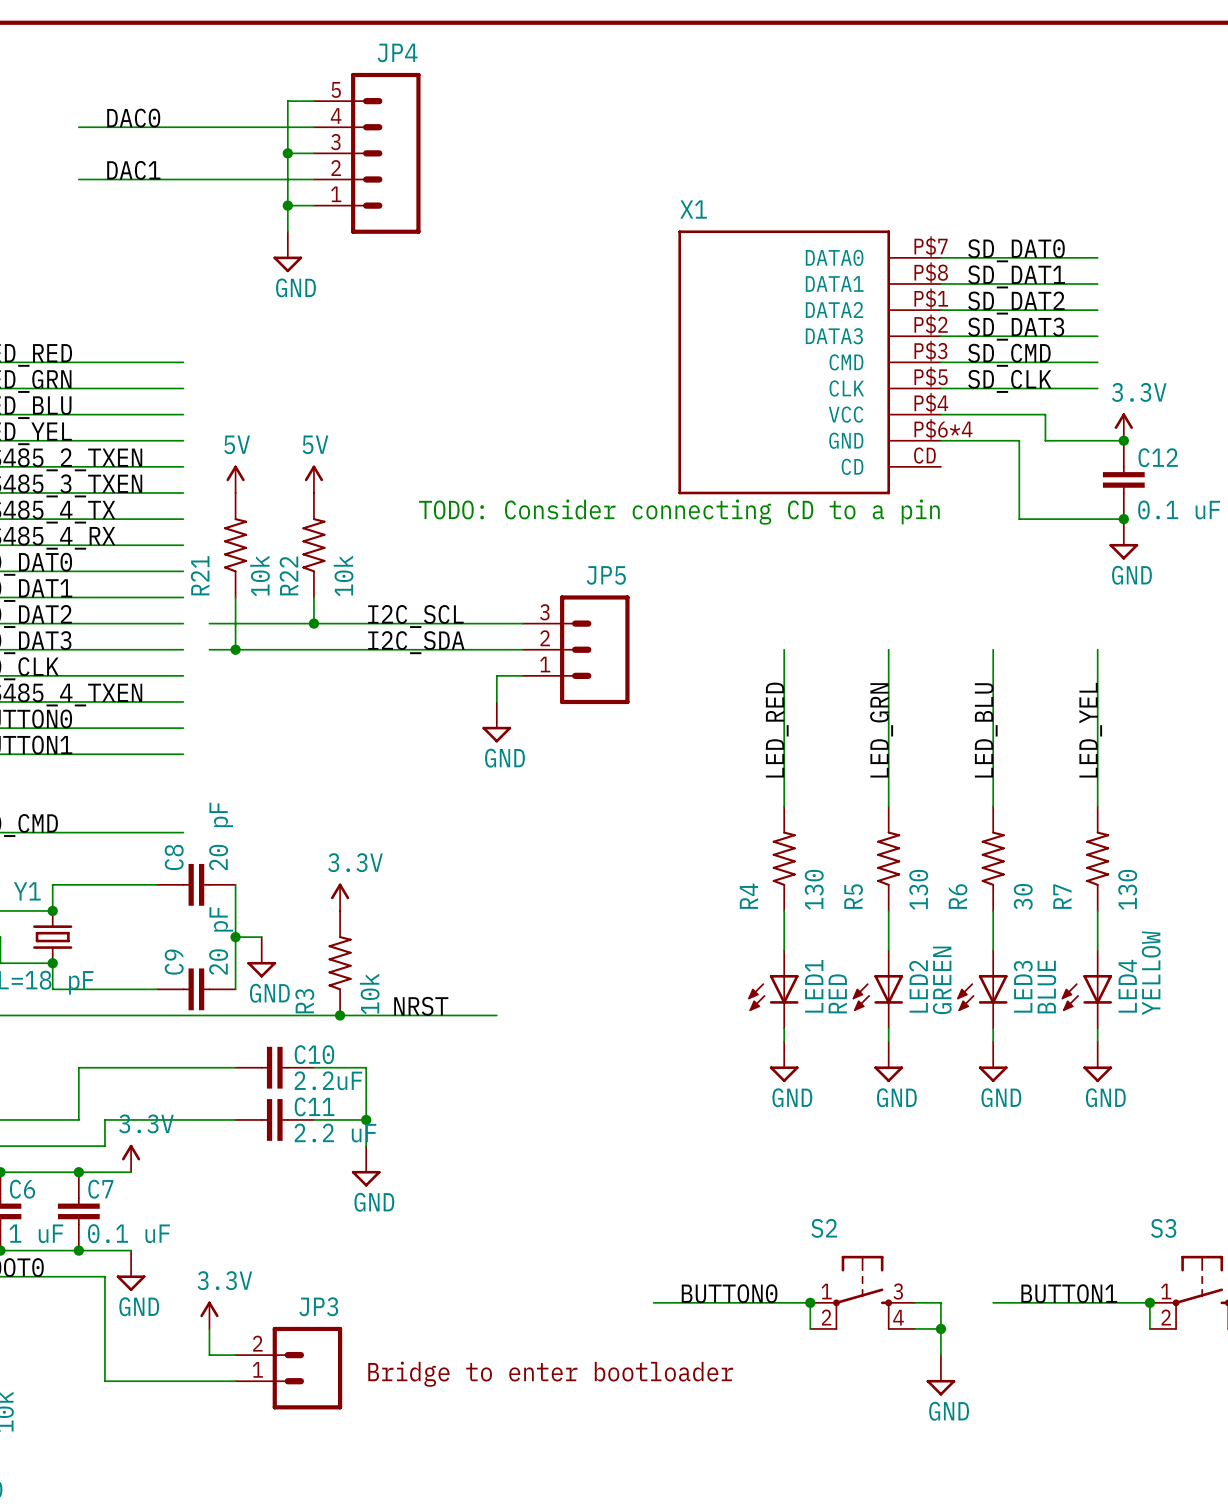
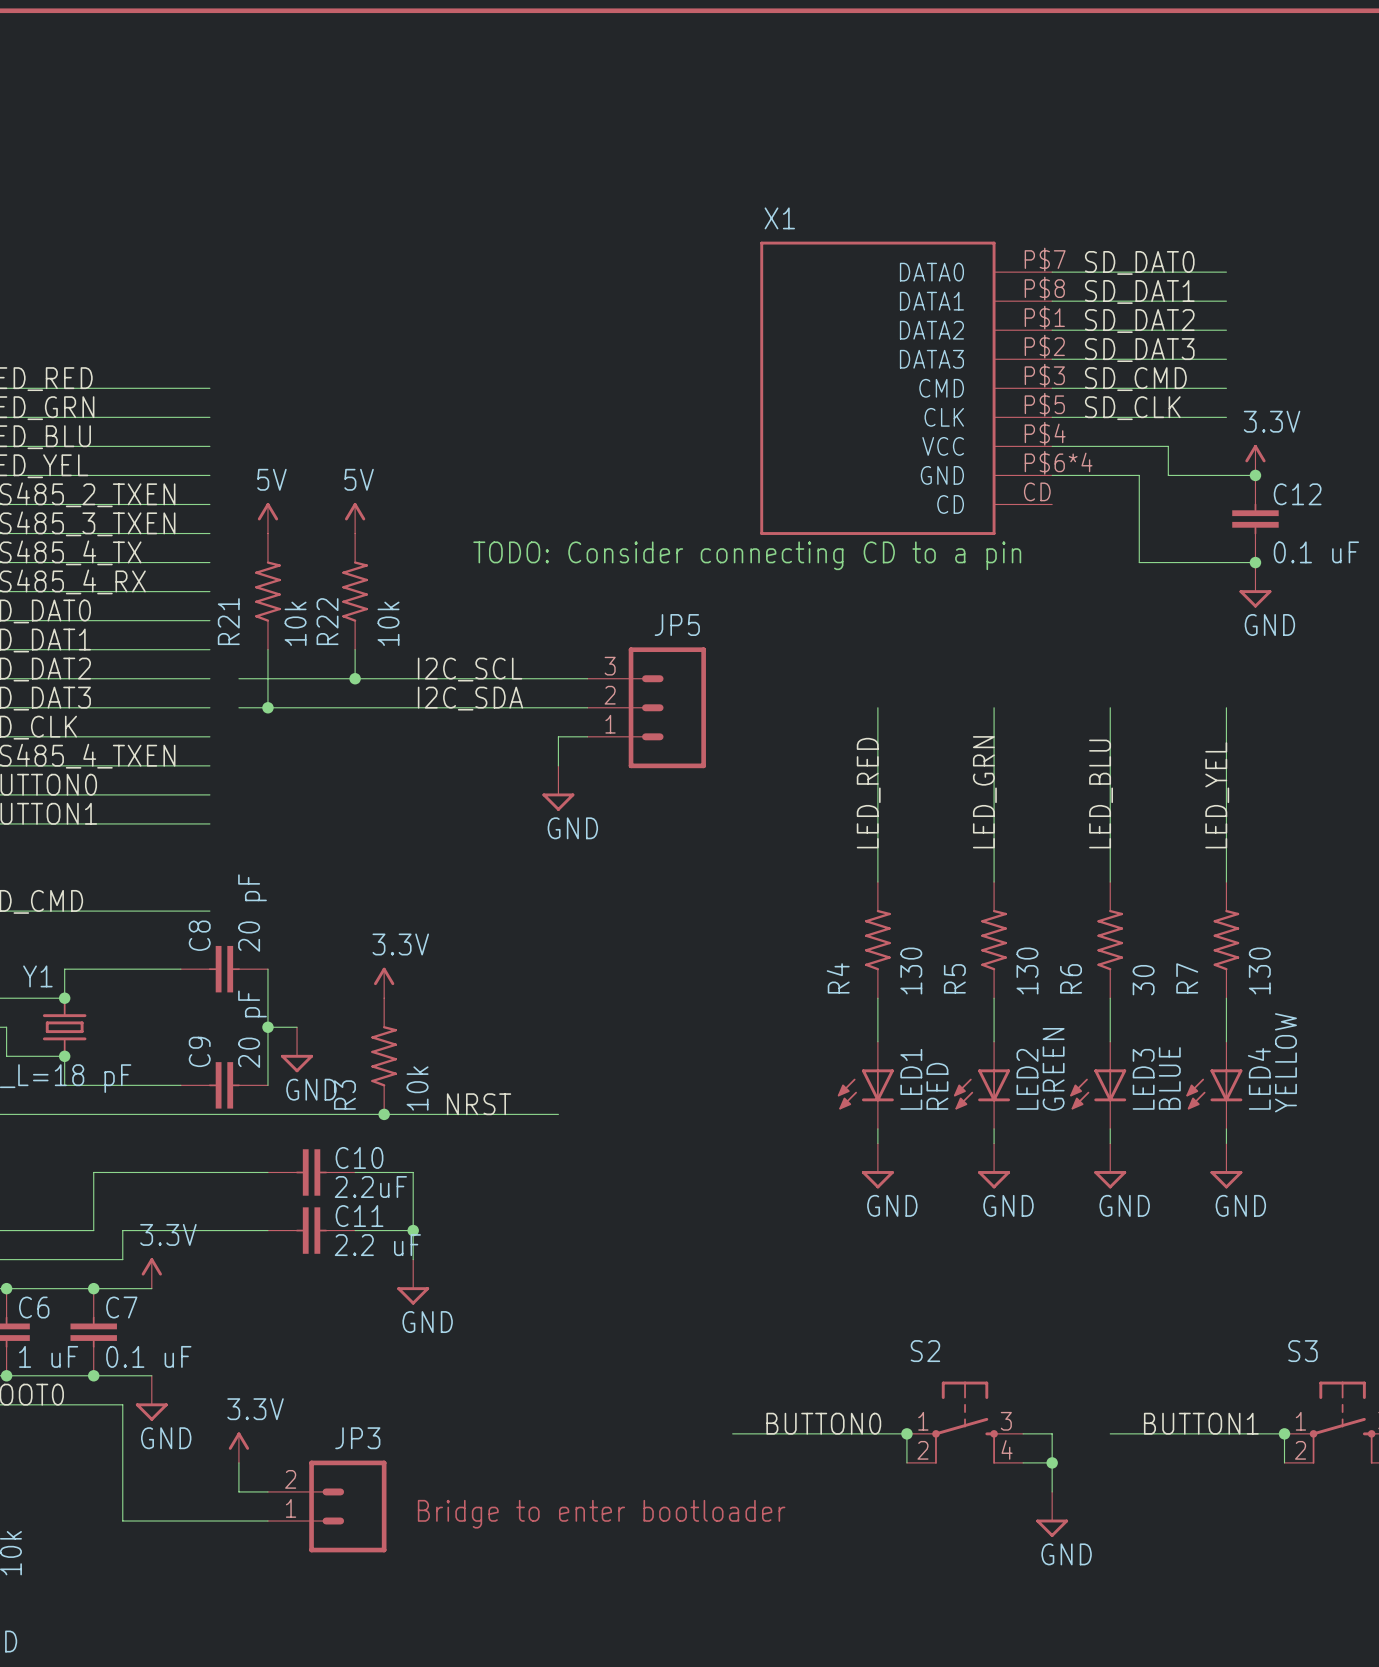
wire: (313, 101) (287, 101) (287, 231) -> none
label: DAC0 (133, 118) -> none
wire: (78, 127) (313, 127) -> none
wire: (287, 153) (313, 153) -> none
junction: (287, 153) -> none
JP4: (367, 153) -> none
label: DAC1 (133, 170) -> none
wire: (78, 179) (313, 179) -> none
wire: (287, 205) (313, 205) -> none
junction: (287, 205) -> none
power symbol: GND (287, 251) -> none

